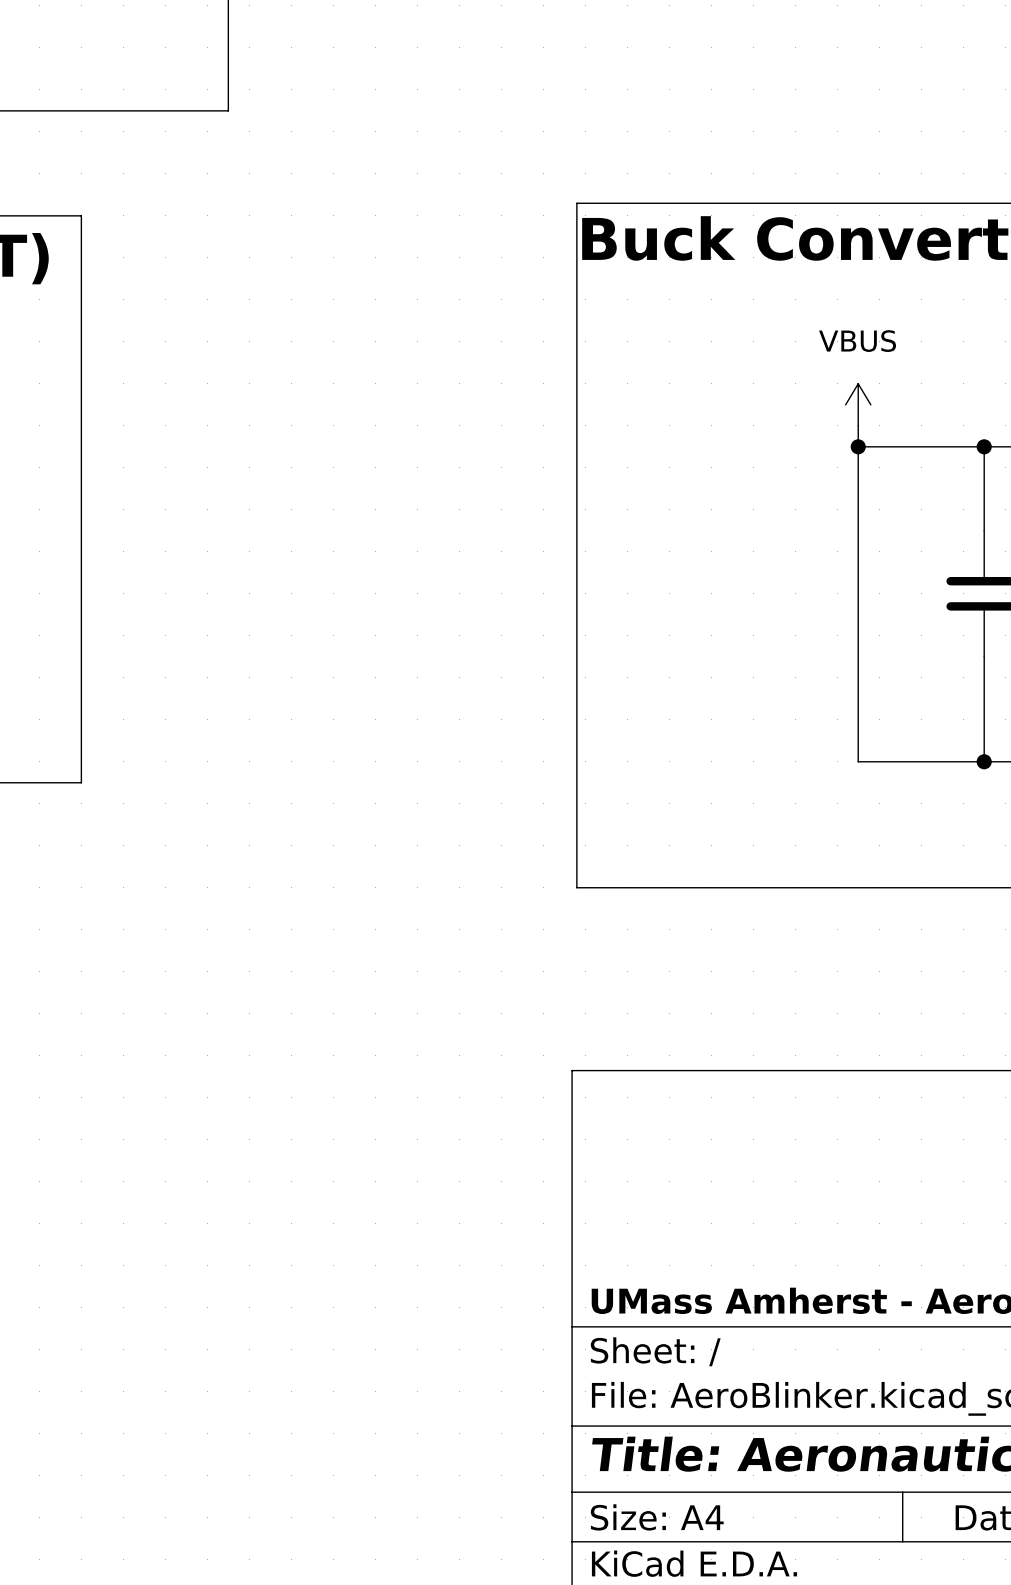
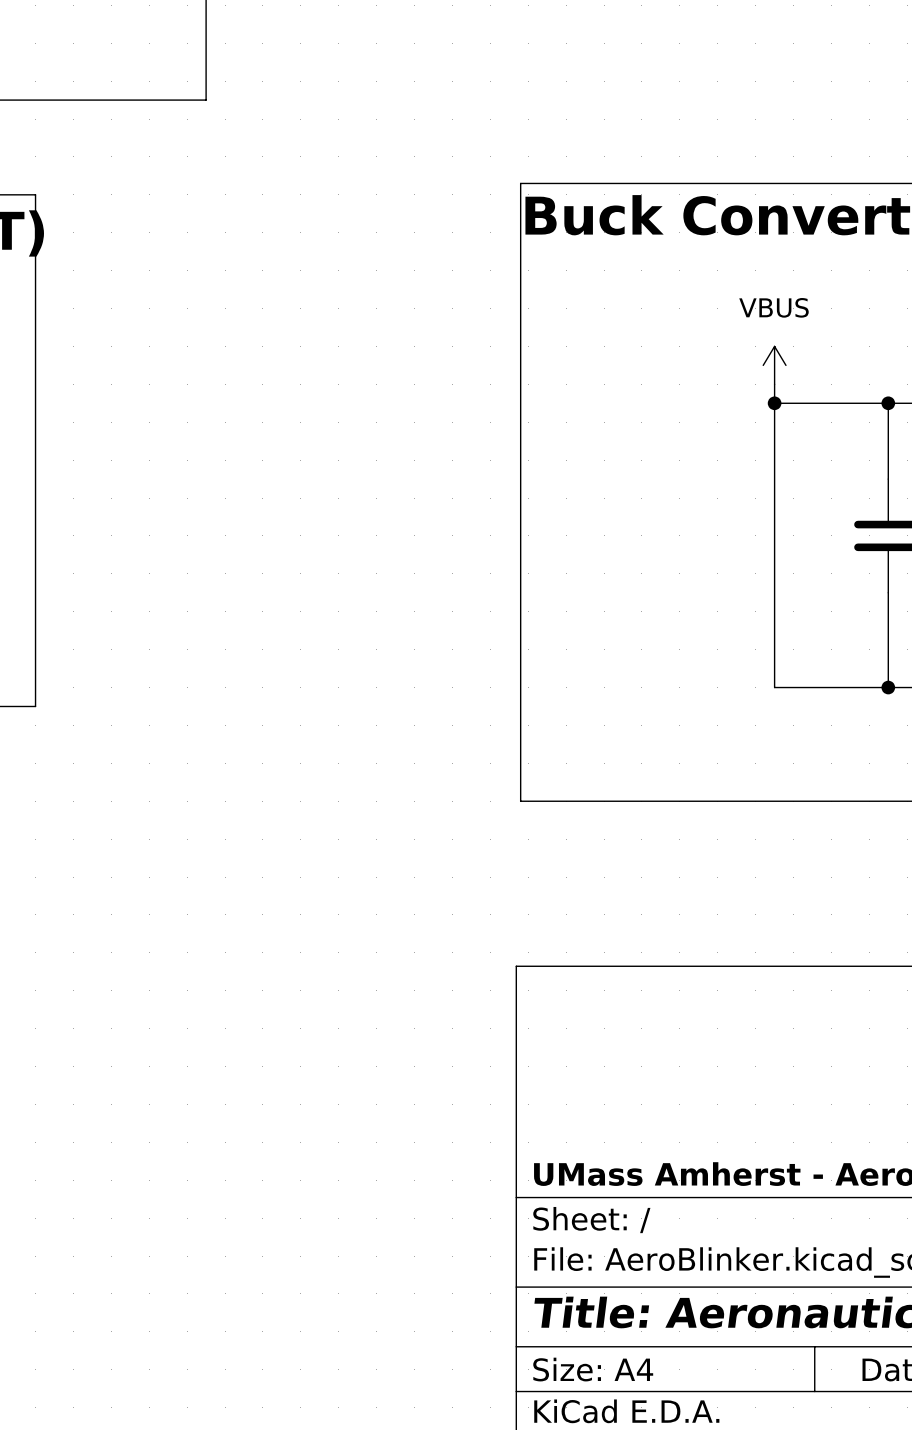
line: (39, 215) (81, 215) (81, 782) (39, 782) -> (35, 194) (35, 706)

